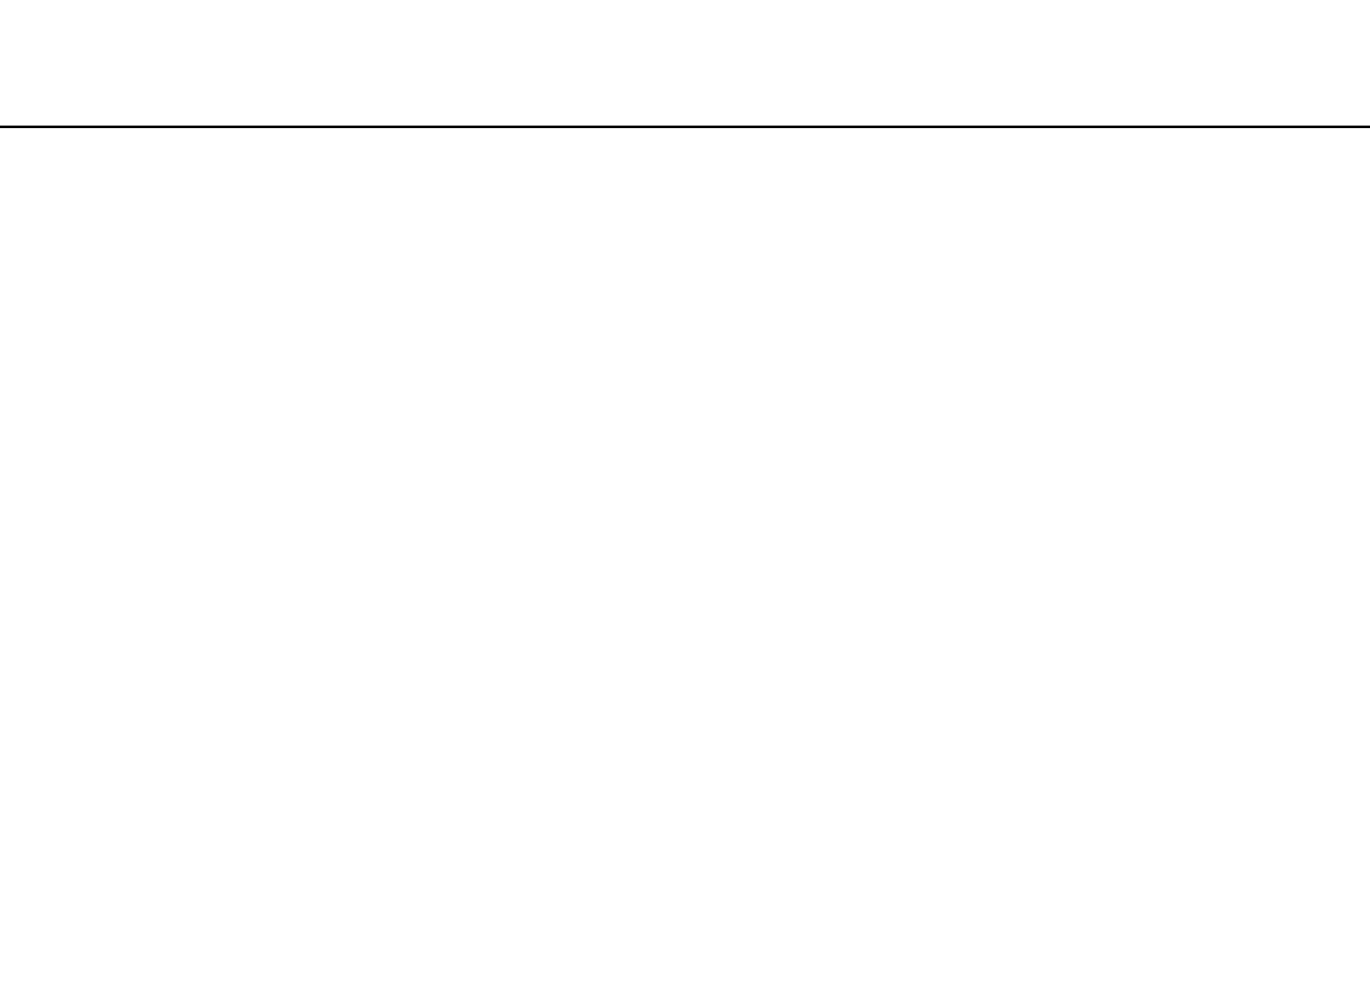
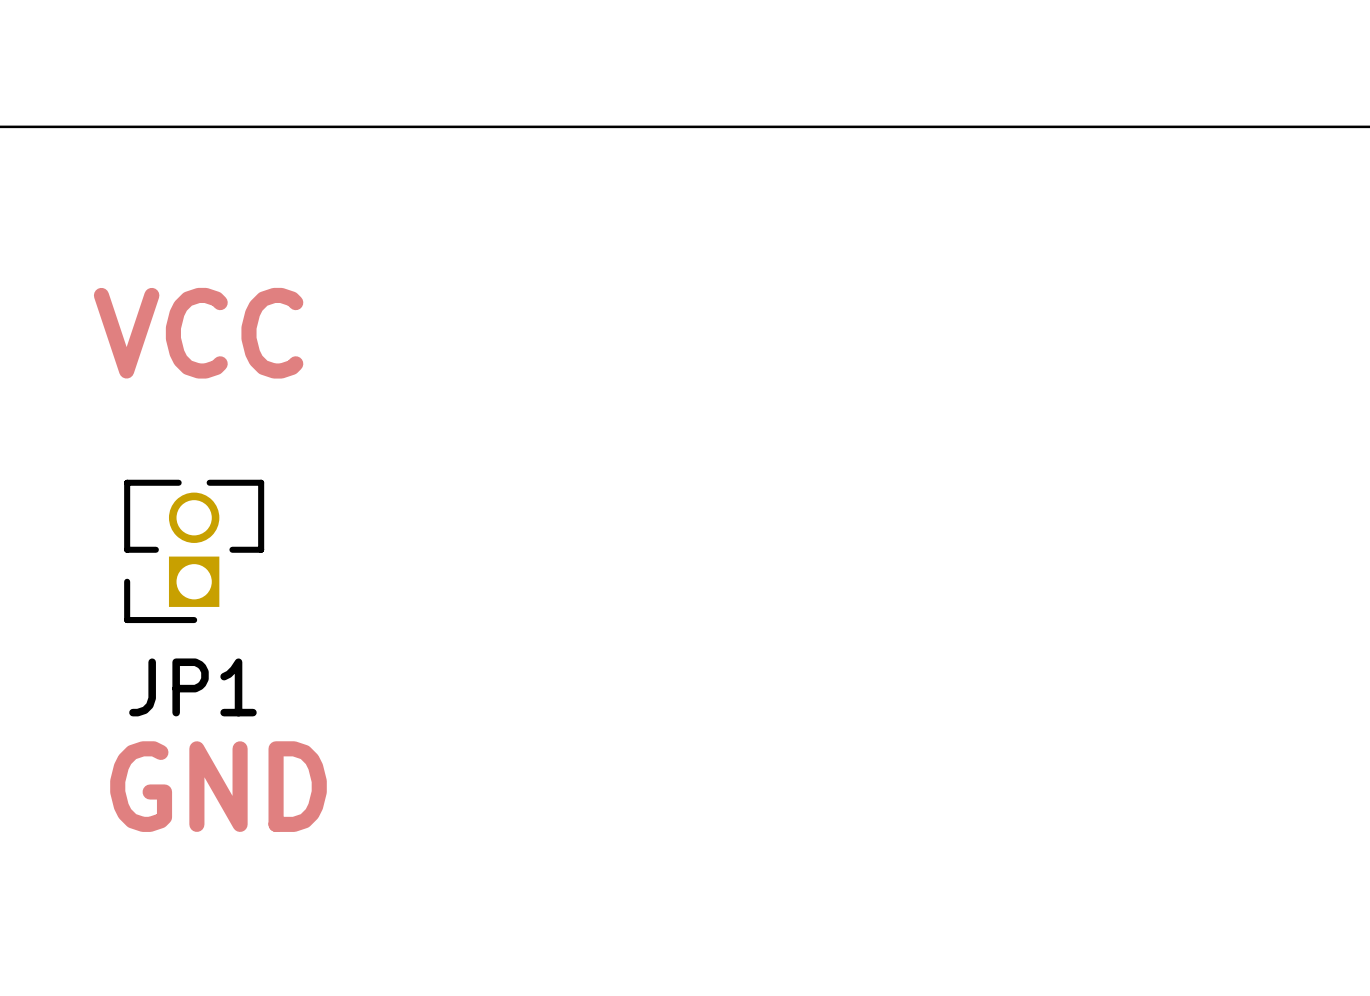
text: none -> VCC (198, 333)
JP1: none -> (194, 551)
text: none -> GND (218, 786)

